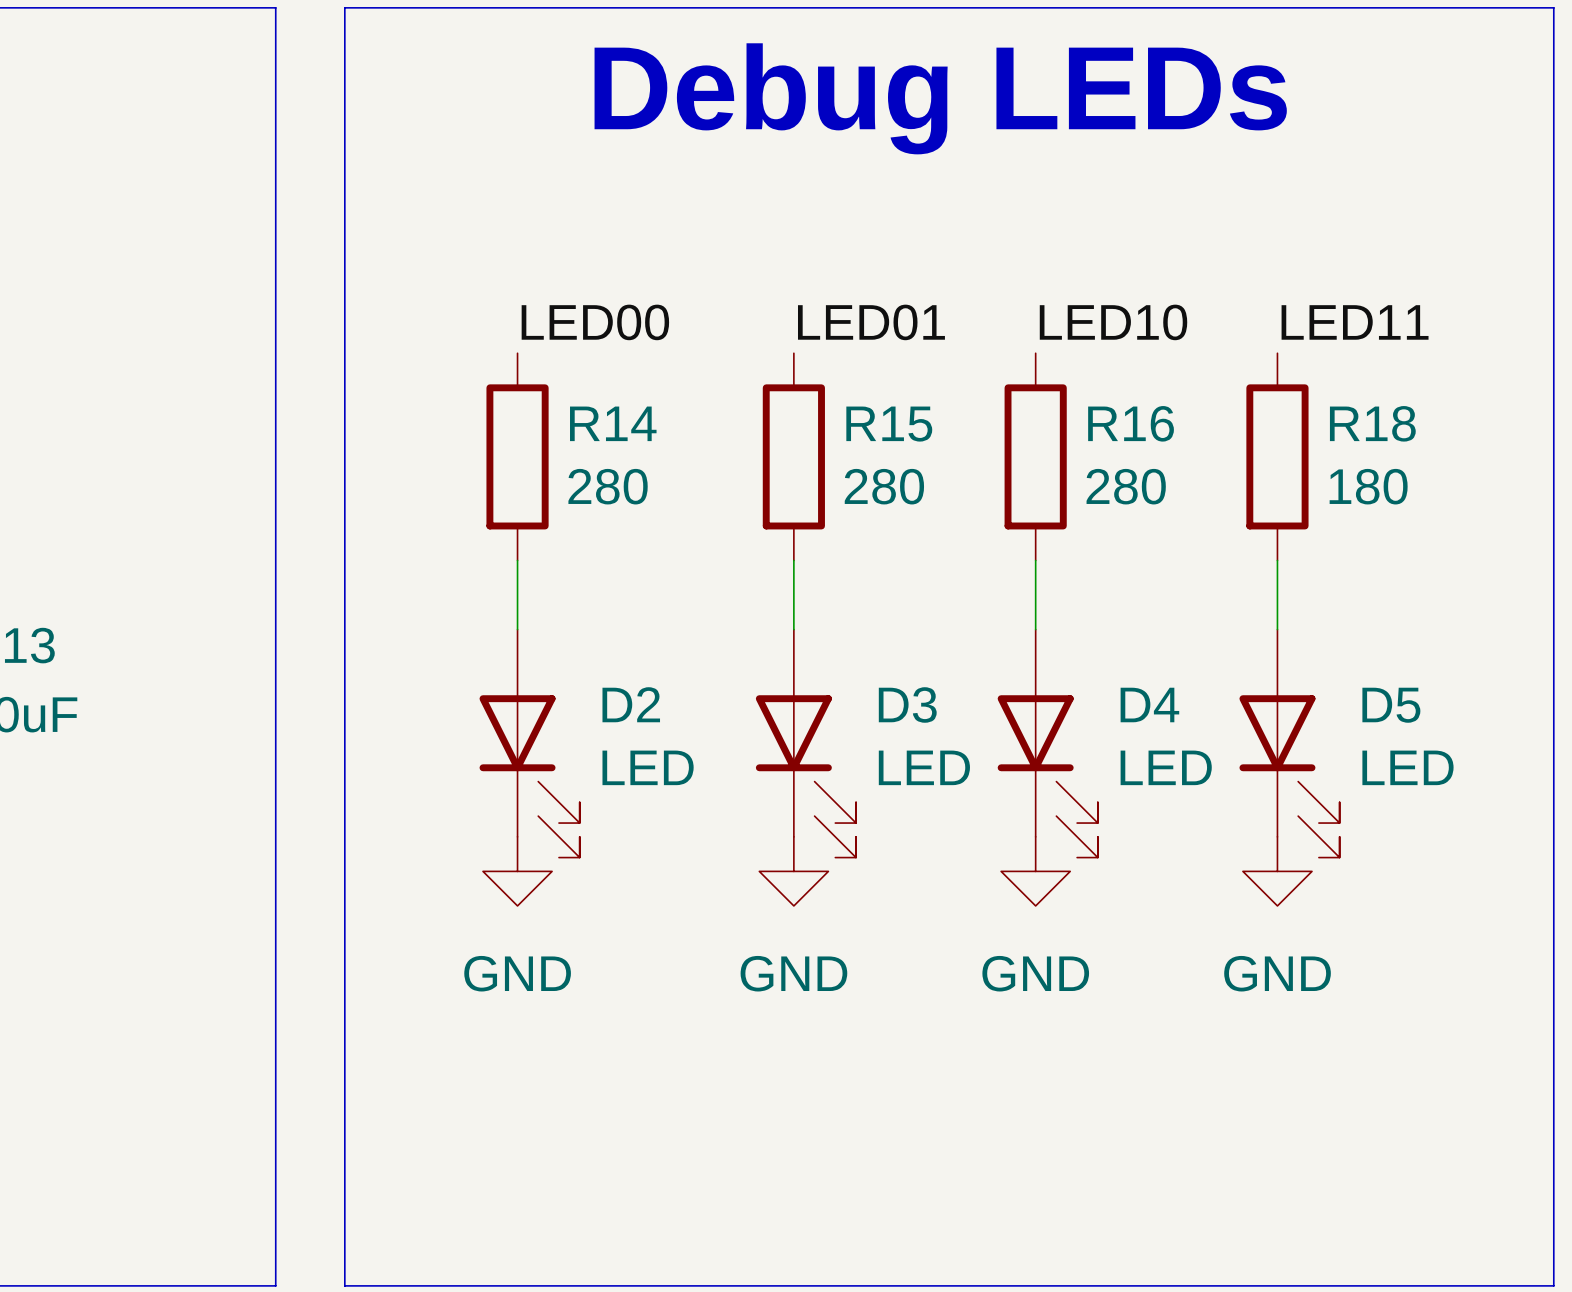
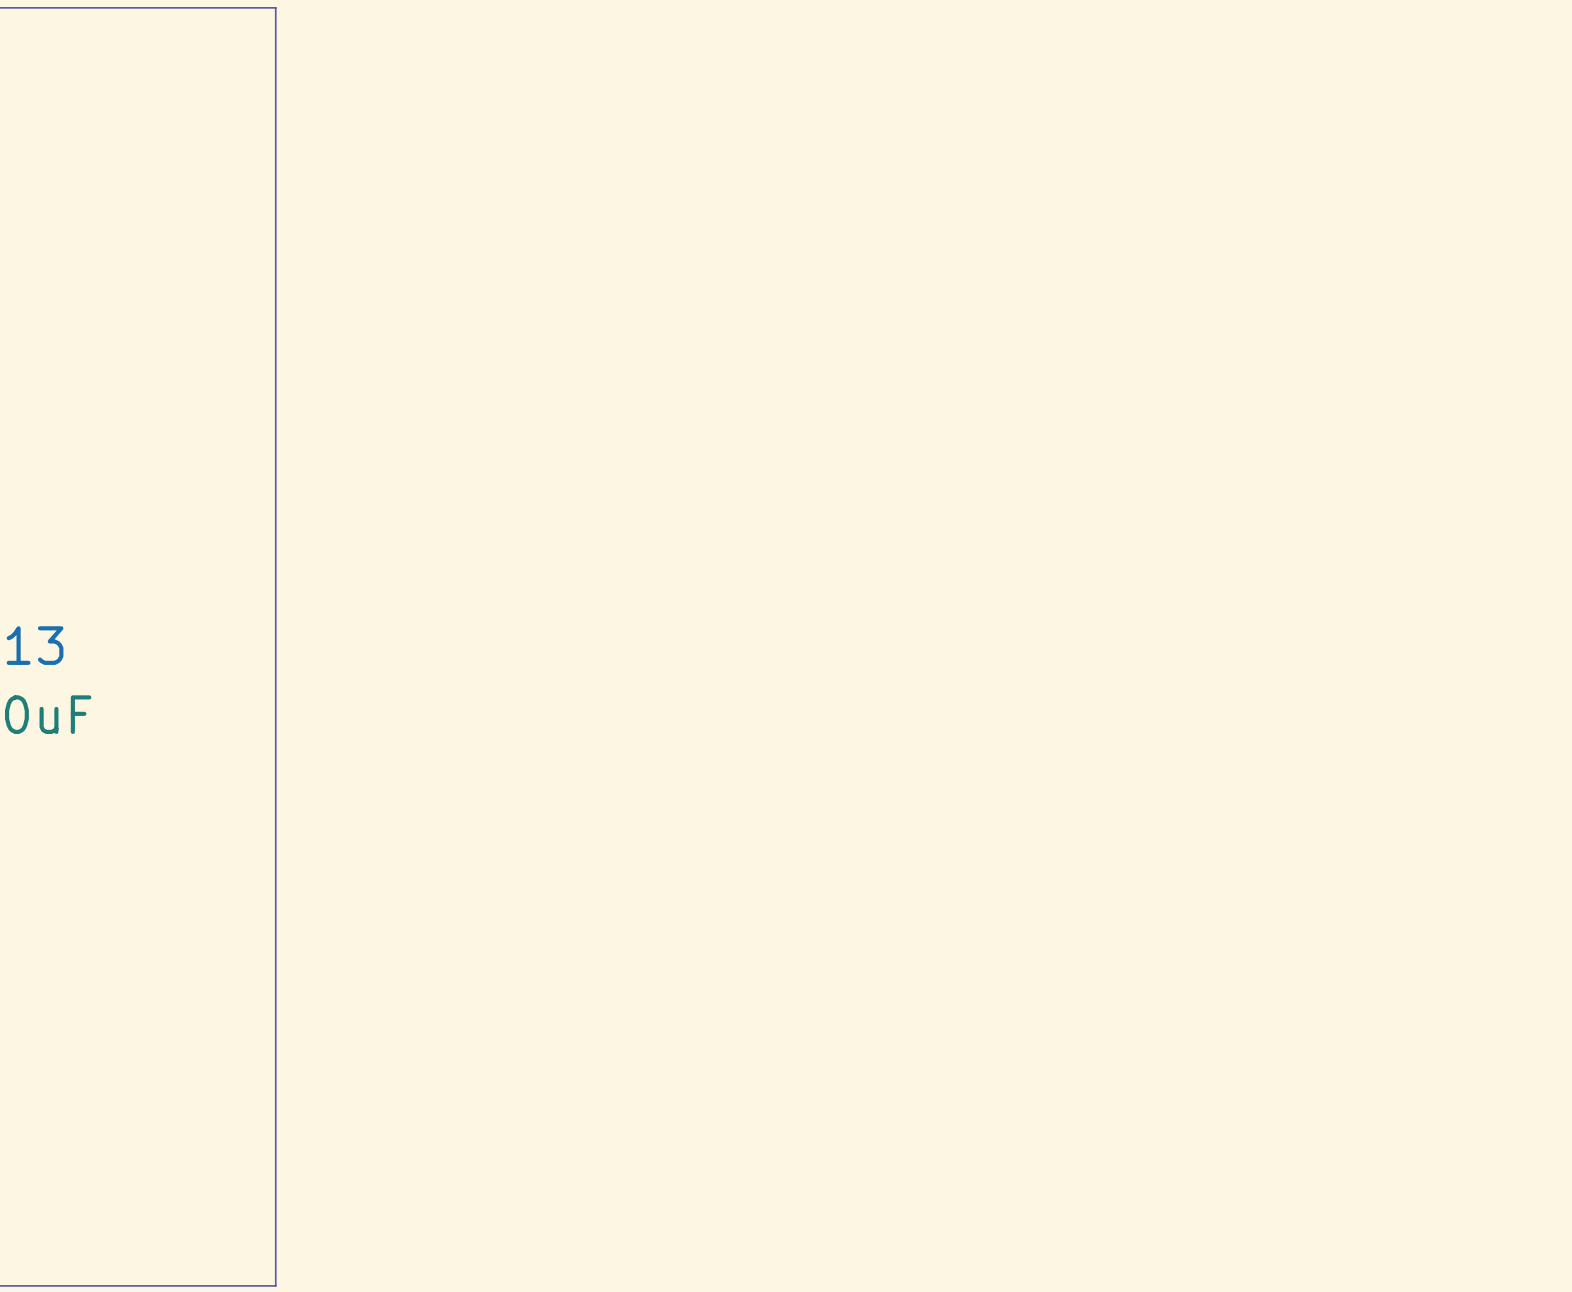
line: (344, 7) (1553, 7) (1553, 1285) (344, 1285) (344, 7) -> none
text: Debug LEDs (940, 98) -> none
label: LED00 (595, 322) -> none
label: LED01 (871, 322) -> none
label: LED10 (1113, 322) -> none
label: LED11 (1355, 322) -> none
R14: 280 (517, 456) -> none
R15: 280 (793, 456) -> none
R16: 280 (1035, 456) -> none
R18: 180 (1277, 456) -> none
wire: (517, 560) (517, 629) -> none
wire: (793, 560) (793, 629) -> none
wire: (1035, 560) (1035, 629) -> none
wire: (1277, 560) (1277, 629) -> none
D2: LED (529, 743) -> none
D3: LED (805, 743) -> none
D4: LED (1047, 743) -> none
D5: LED (1289, 743) -> none
power symbol: GND (517, 871) -> none
power symbol: GND (793, 871) -> none
power symbol: GND (1035, 871) -> none
power symbol: GND (1277, 871) -> none

